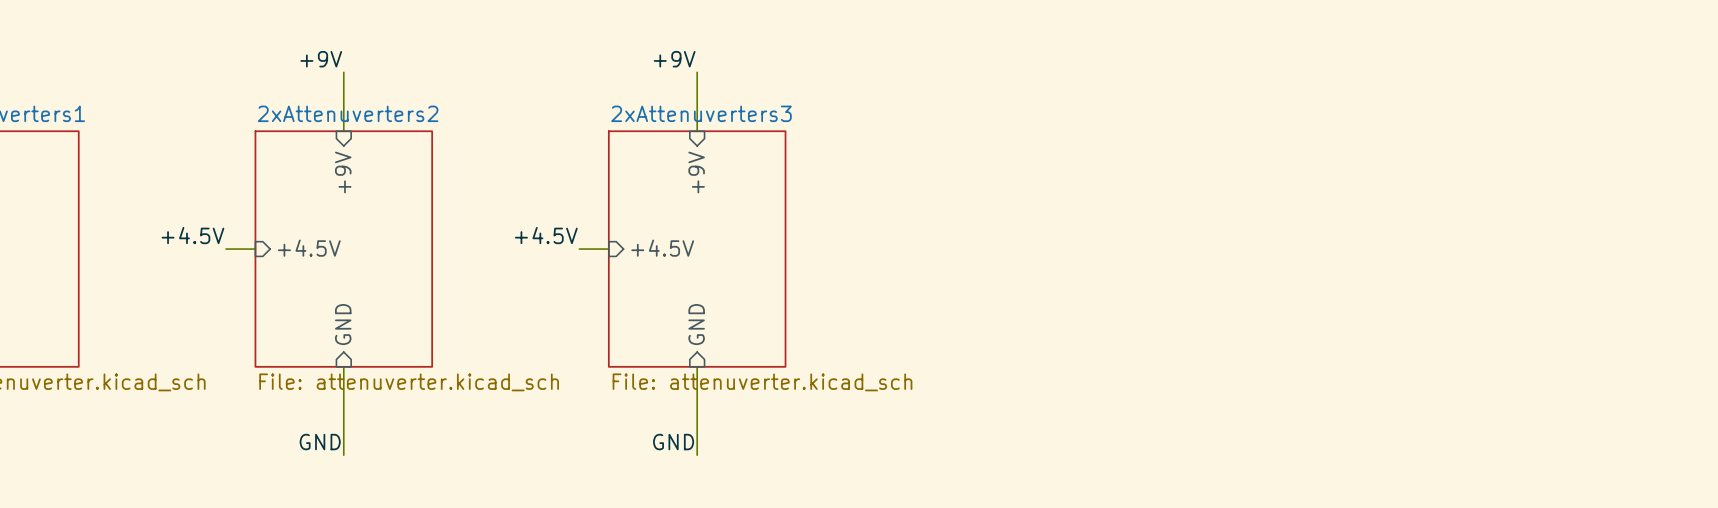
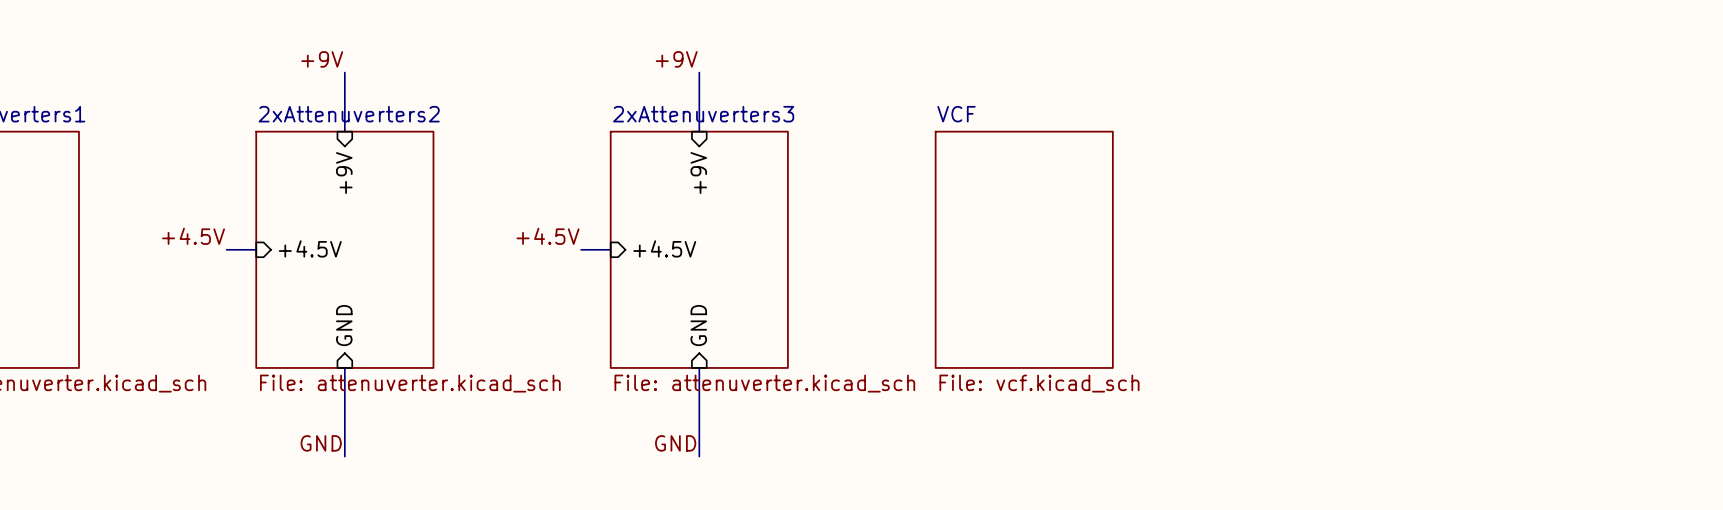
sheet VCF: none -> File: vcf.kicad_sch (1024, 249)

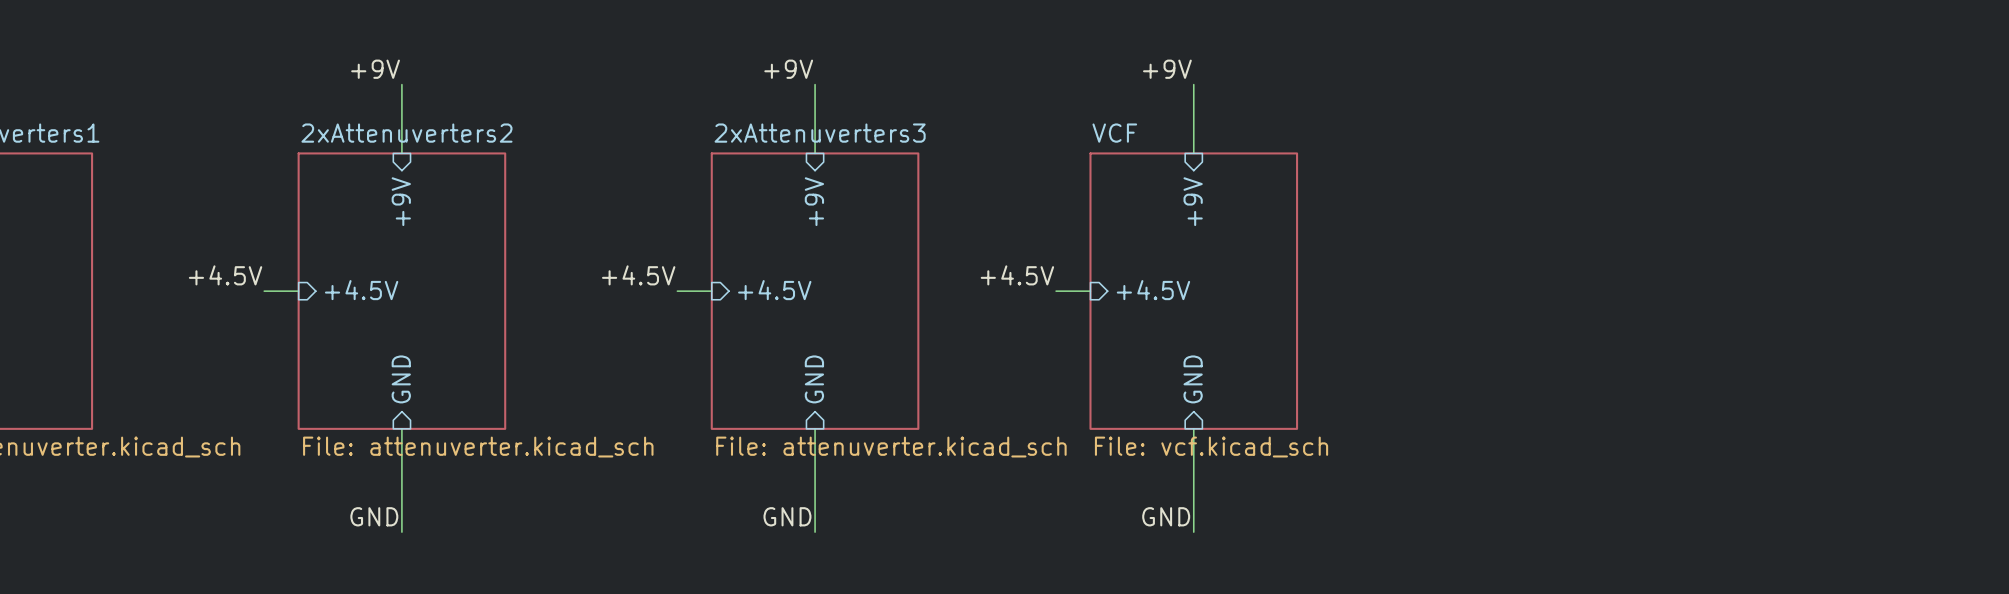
label: none -> +9V (1167, 69)
wire: none -> (1193, 84) (1193, 153)
sheet pin: none -> +9V (1193, 201)
label: none -> +4.5V (1017, 275)
sheet pin: none -> +4.5V (1153, 290)
wire: none -> (1056, 291) (1090, 291)
sheet pin: none -> GND (1193, 379)
wire: none -> (1193, 428) (1193, 532)
label: none -> GND (1166, 516)

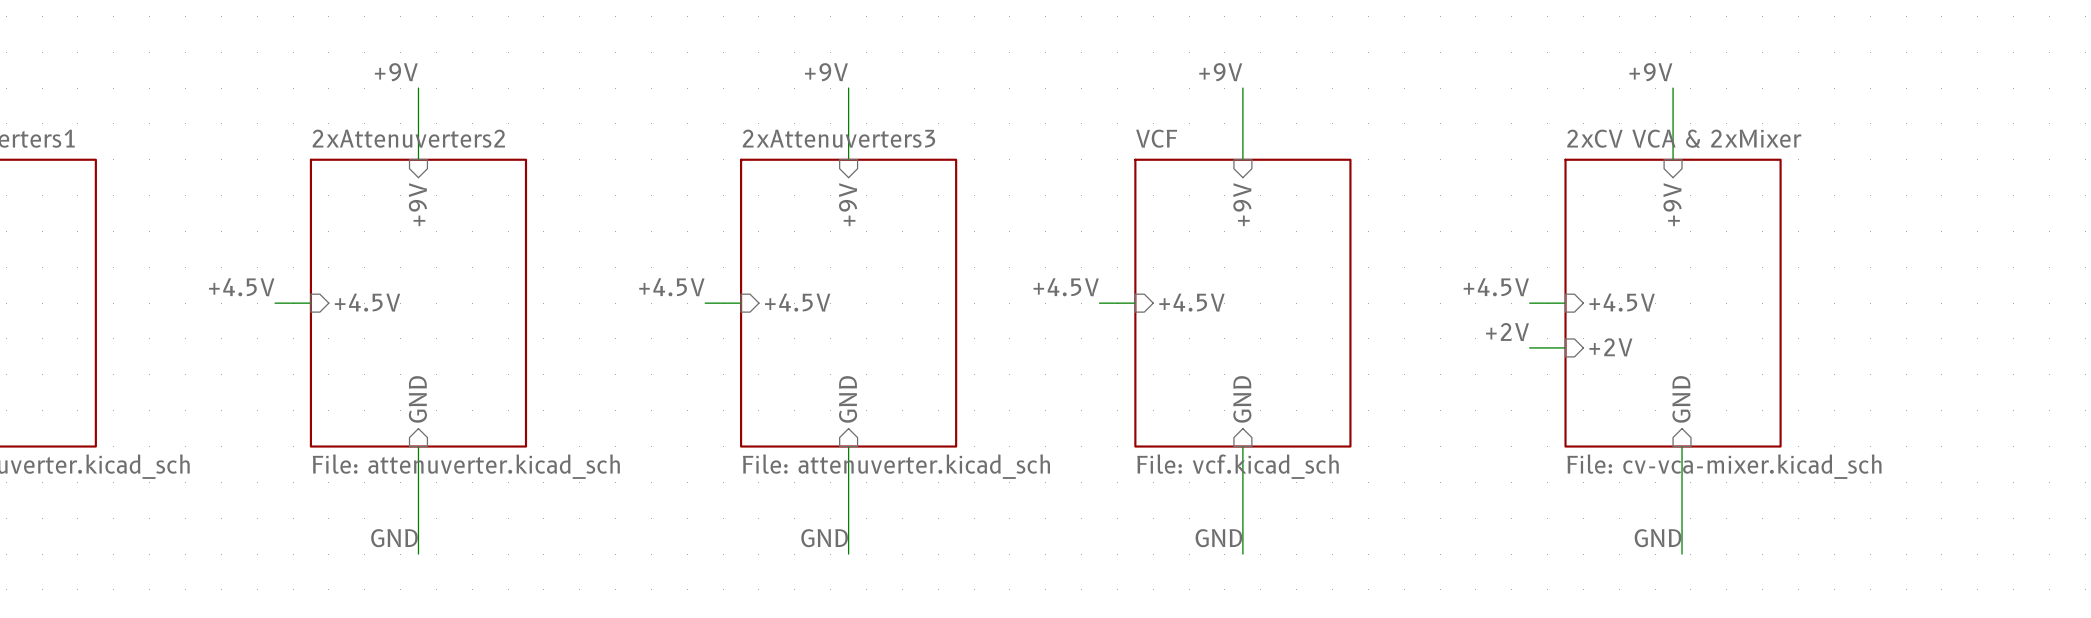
label: none -> +9V (1650, 72)
wire: none -> (1673, 88) (1673, 159)
sheet pin: none -> +9V (1672, 204)
label: none -> +4.5V (1496, 287)
sheet pin: none -> +4.5V (1622, 302)
wire: none -> (1529, 303) (1565, 303)
sheet 2xCV VCA & 2xMixer: none -> File: cv-vca-mixer.kicad_sch (1673, 303)
label: none -> +2V (1507, 332)
sheet pin: none -> +2V (1610, 347)
wire: none -> (1529, 347) (1565, 347)
sheet pin: none -> GND (1681, 399)
wire: none -> (1682, 446) (1682, 554)
label: none -> GND (1658, 538)

